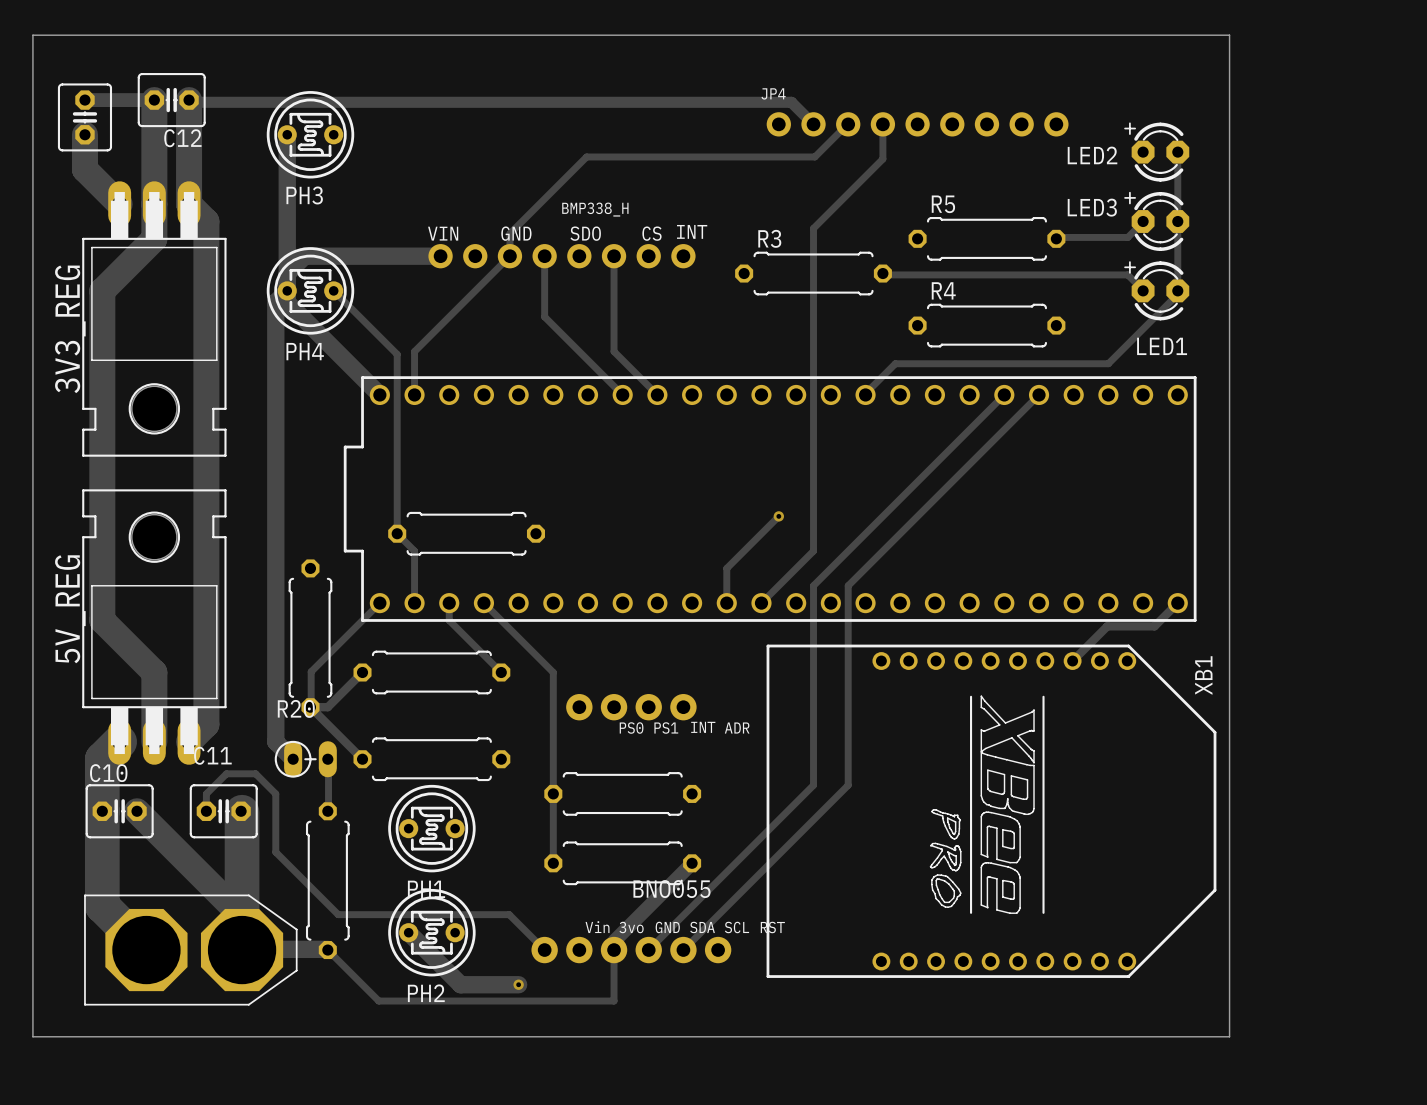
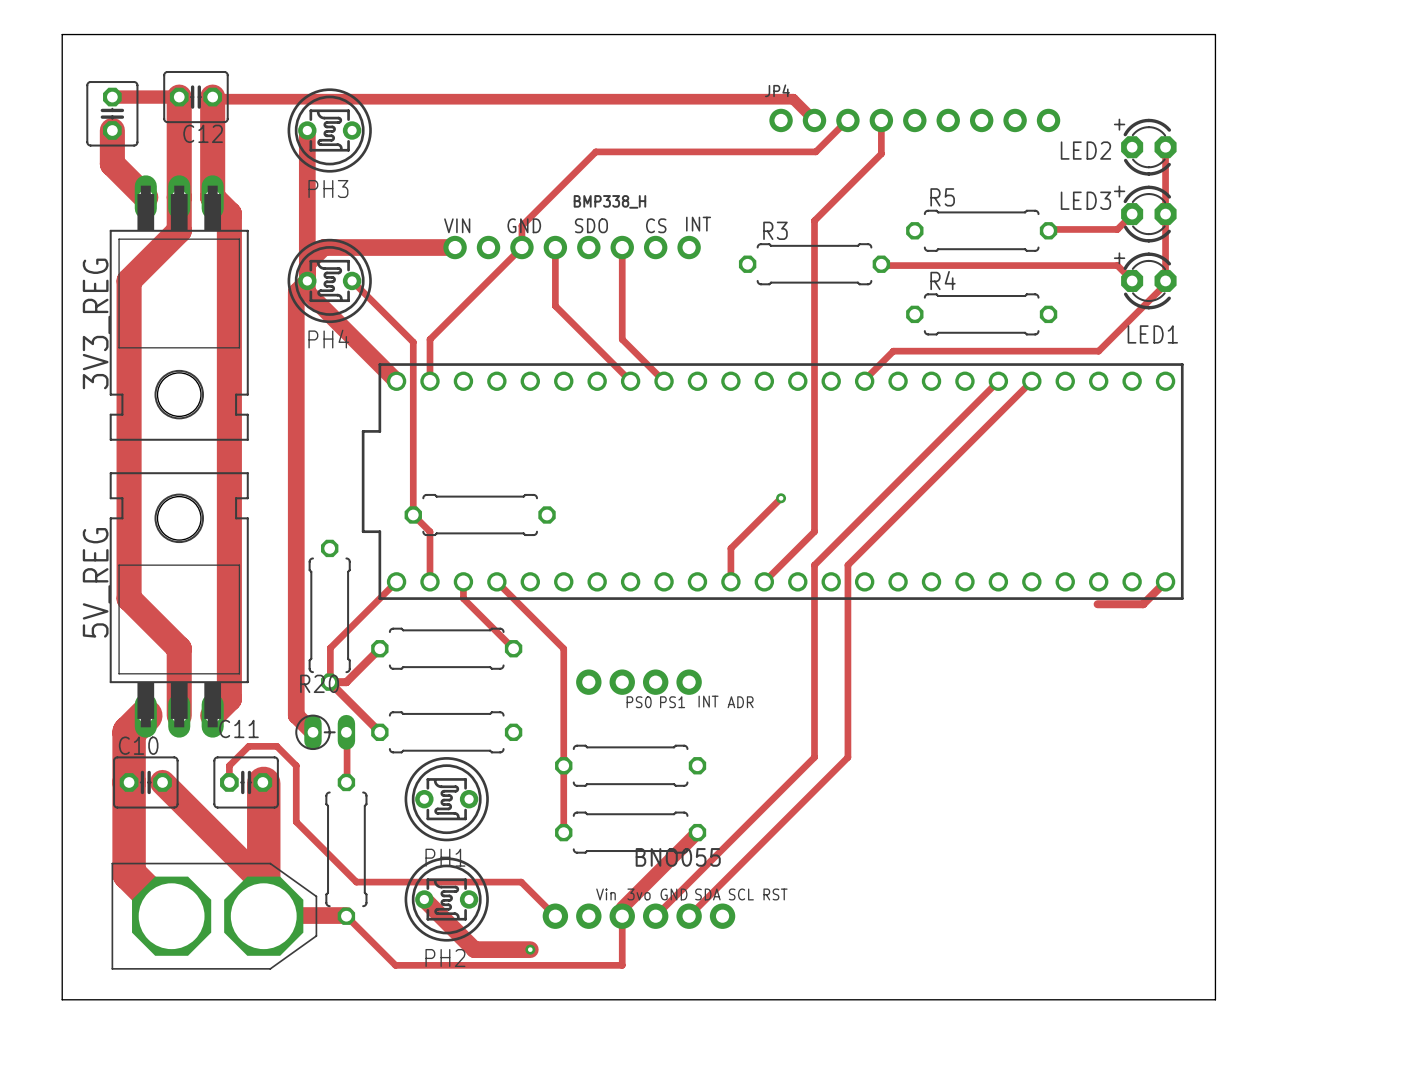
track: (1107, 626) (1072, 661) -> none
XB1: (991, 811) -> none

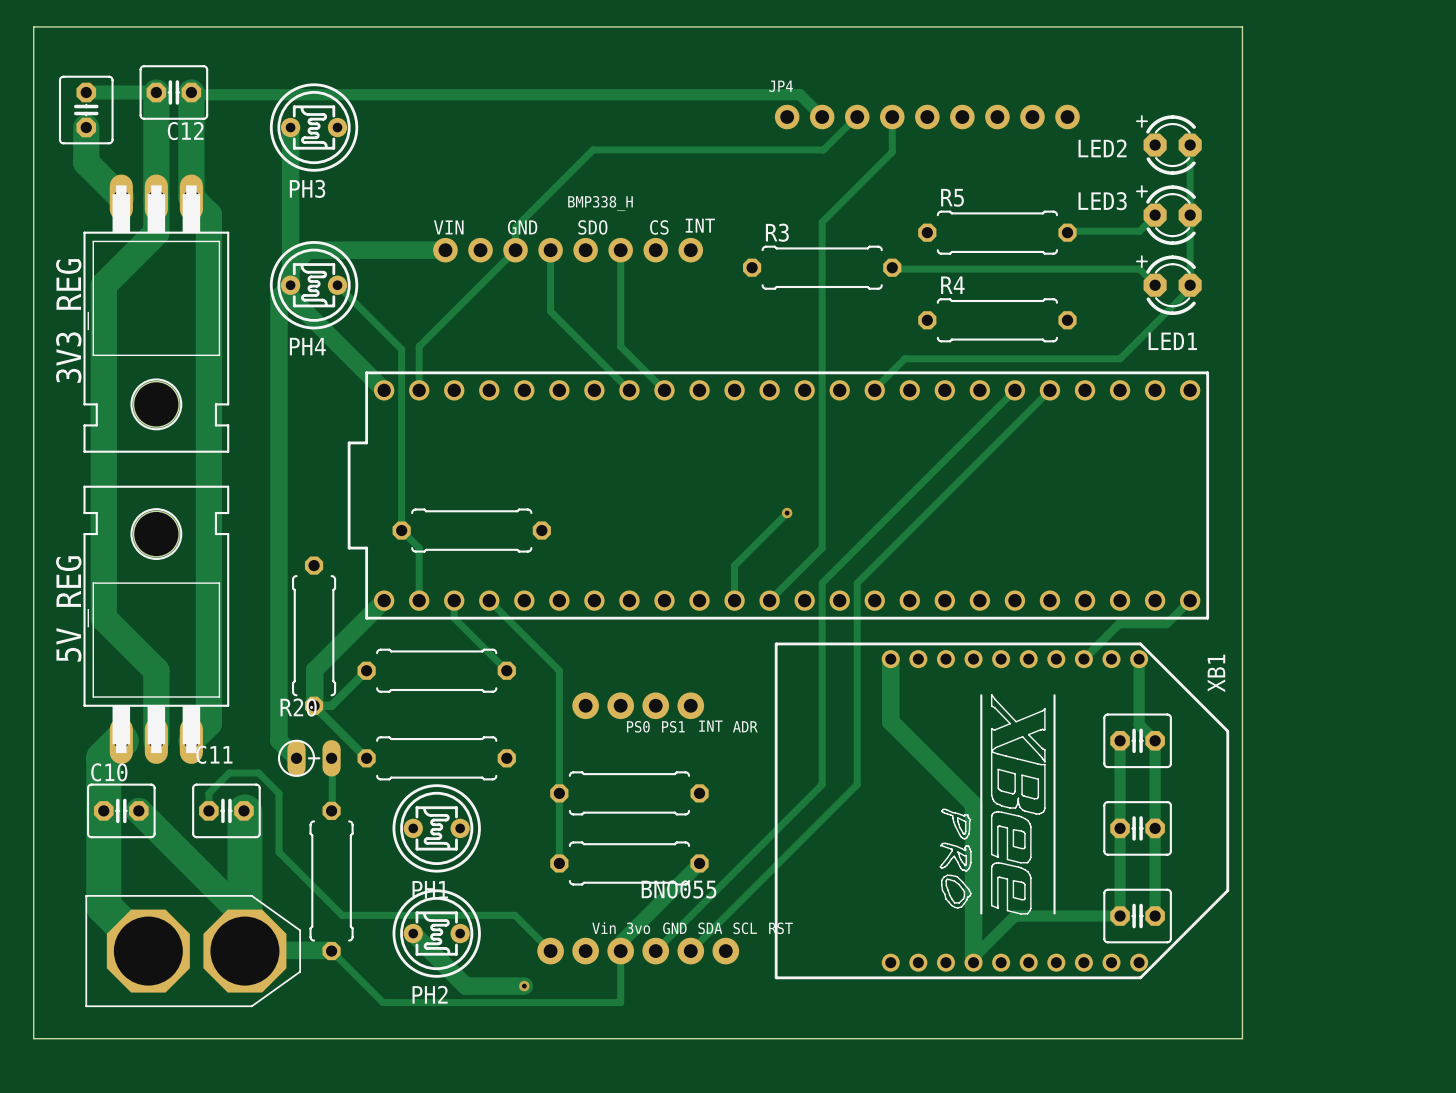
track width: thin (396, 581) (330, 648) (330, 681) -> thick (384, 600) (314, 670) (314, 705)
track: none -> (1118, 624) (1083, 659)
track: none -> (890, 659) (890, 721) (973, 804) (973, 962) (973, 957) (1014, 916) (1120, 916) (1120, 740)
track: none -> (1139, 659) (1139, 724) (1155, 740) (1155, 916)
part: none -> (1137, 740)
XB1: none -> (1001, 810)
part: none -> (1137, 828)
part: none -> (1137, 916)

